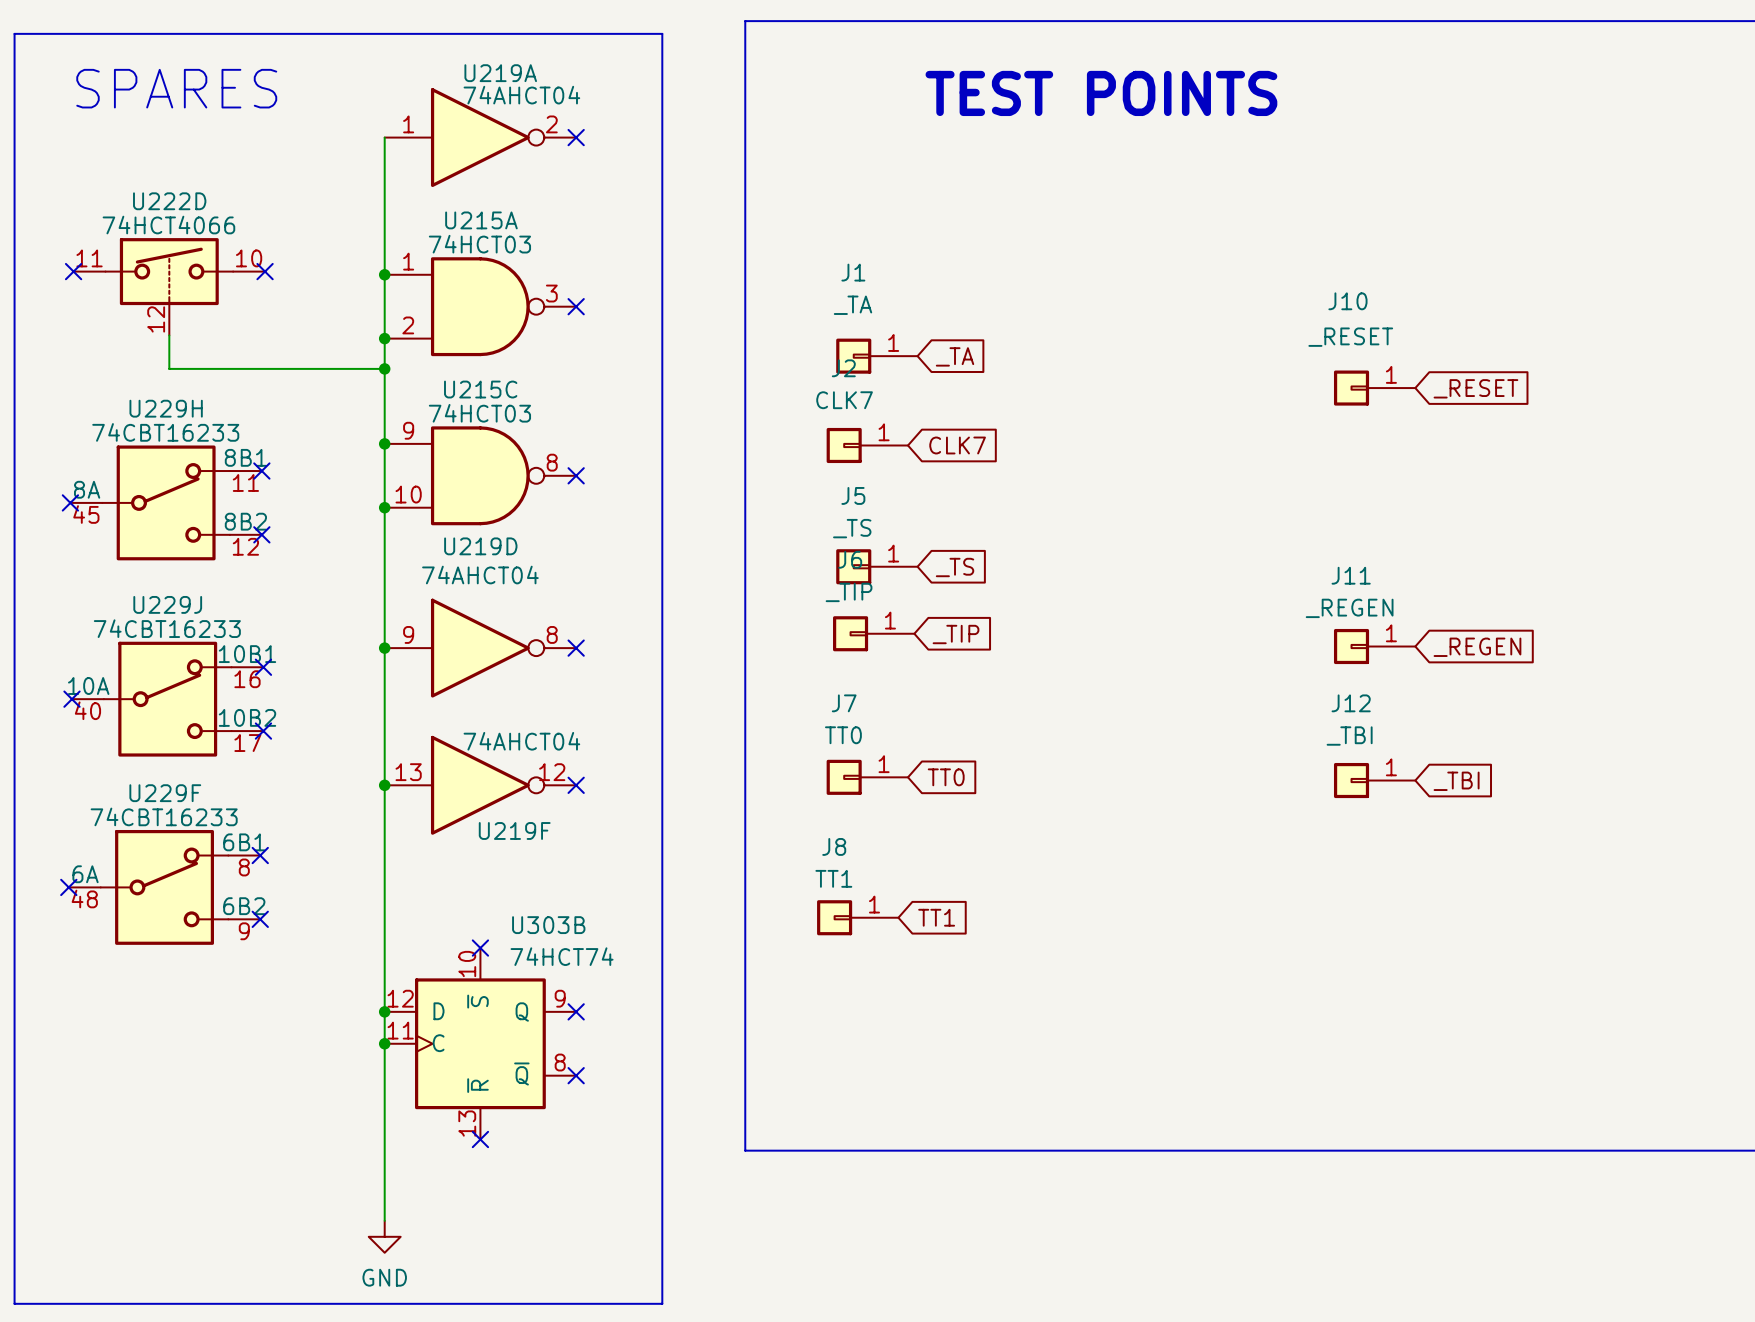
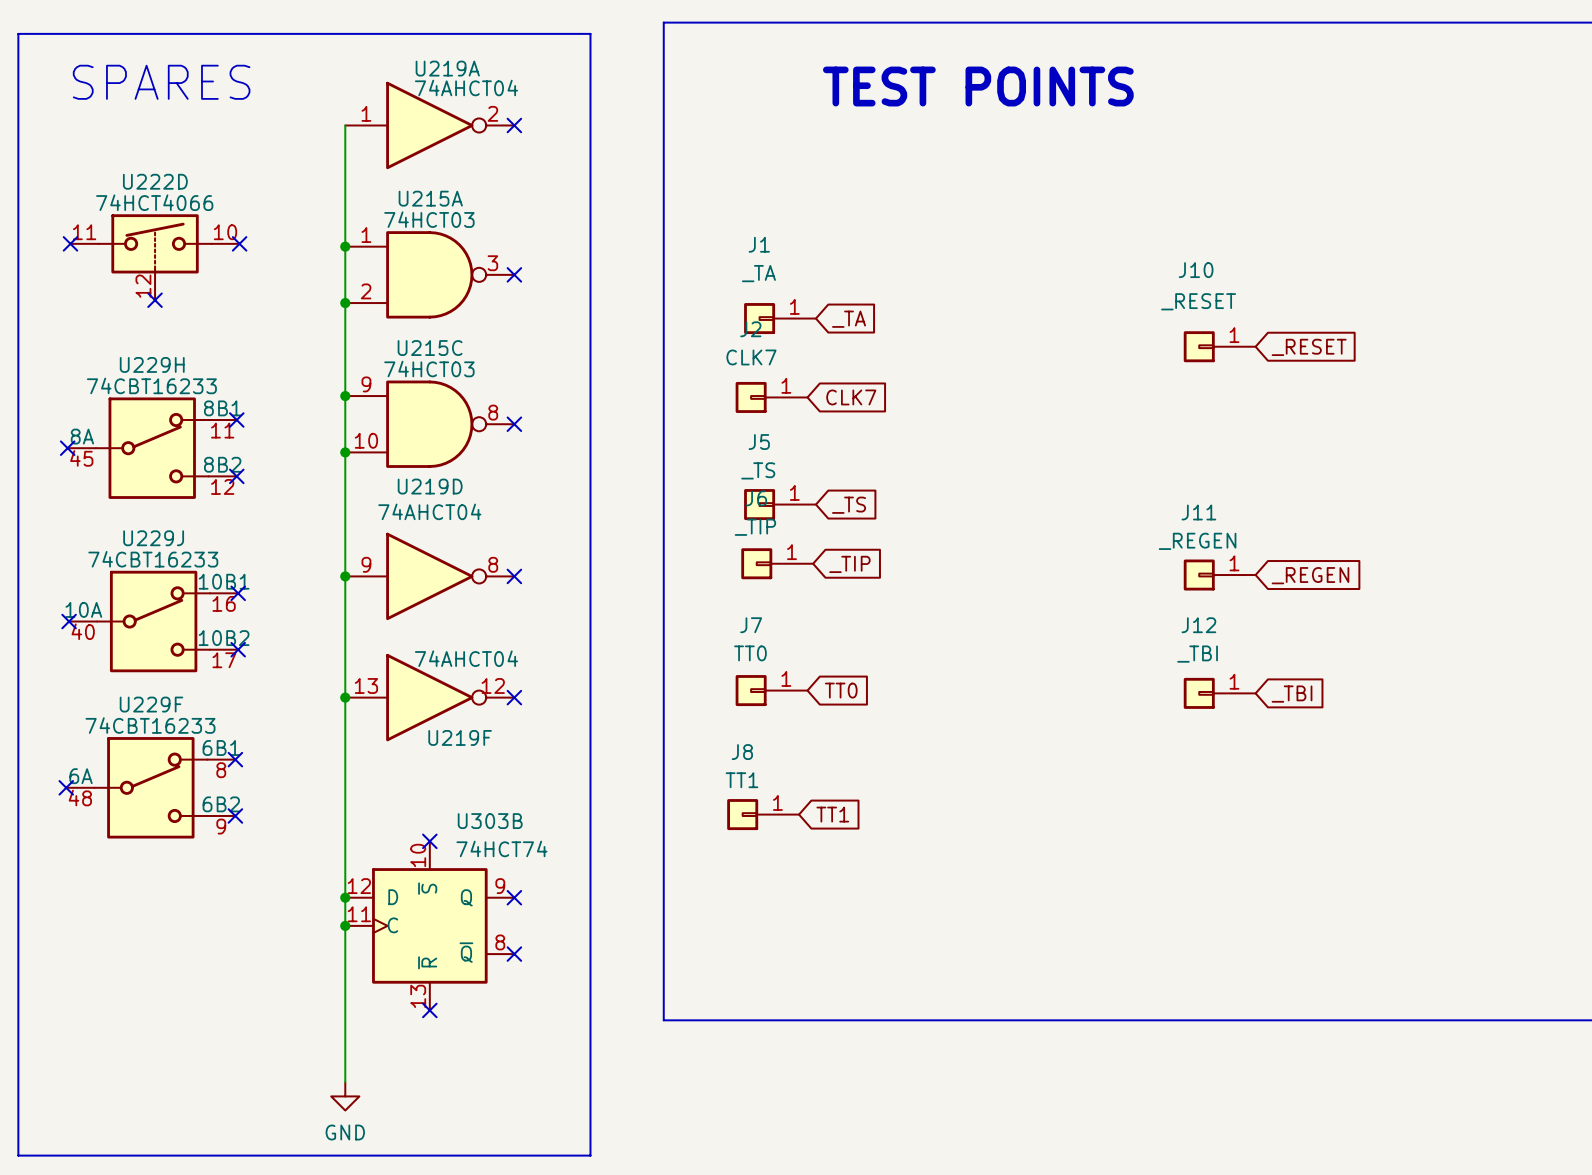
wire: (169, 335) (169, 368) (384, 368) -> none
no-connect mark: none -> (155, 300)
junction: (384, 368) -> none

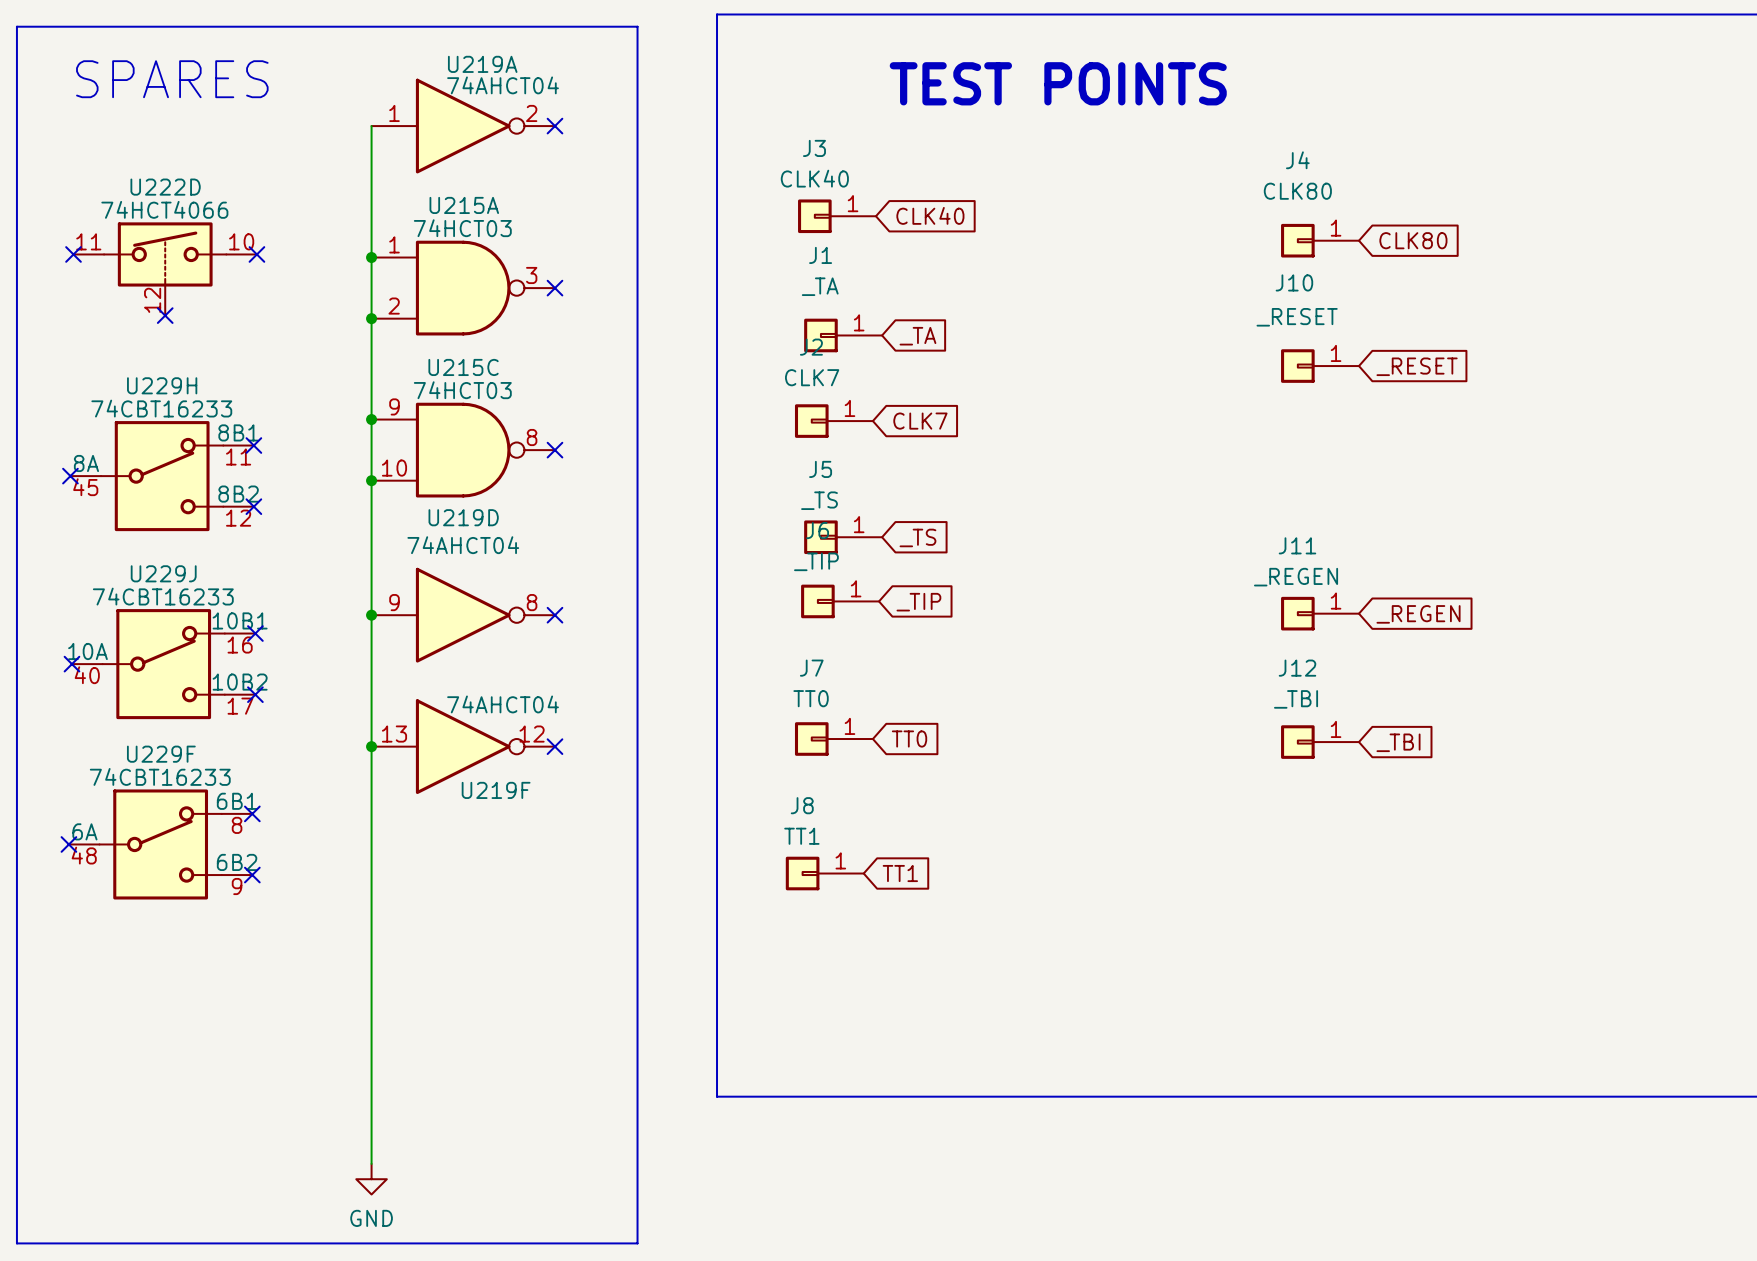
J3: none -> CLK40 (837, 216)
global label: none -> CLK40 (930, 215)
J4: none -> CLK80 (1320, 240)
global label: none -> CLK80 (1413, 240)
no-connect mark: (429, 841) -> none
junction: (345, 897) -> none
no-connect mark: (514, 897) -> none
junction: (345, 925) -> none
U303B: 74HCT74 (429, 925) -> none
no-connect mark: (514, 954) -> none
no-connect mark: (429, 1010) -> none

